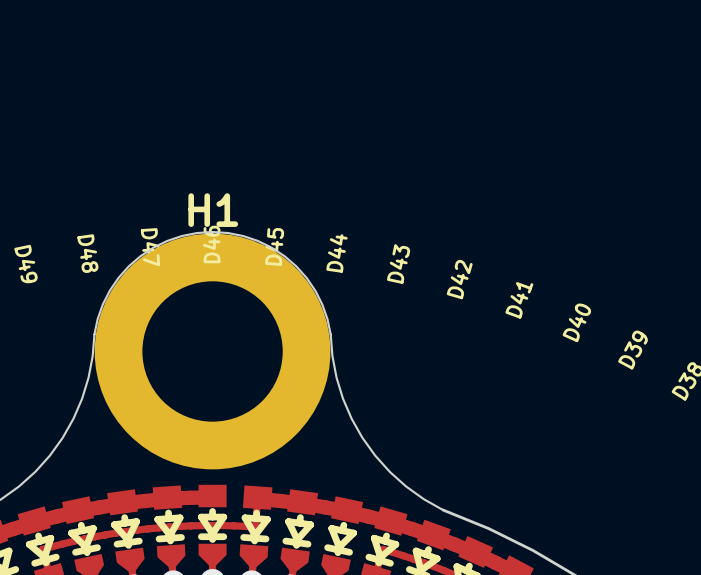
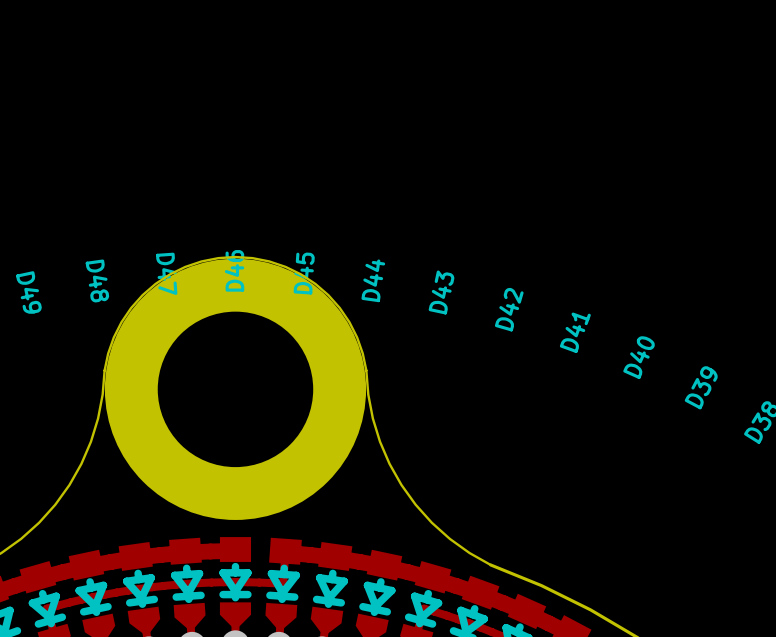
H1 name: H1 (213, 210) -> none

